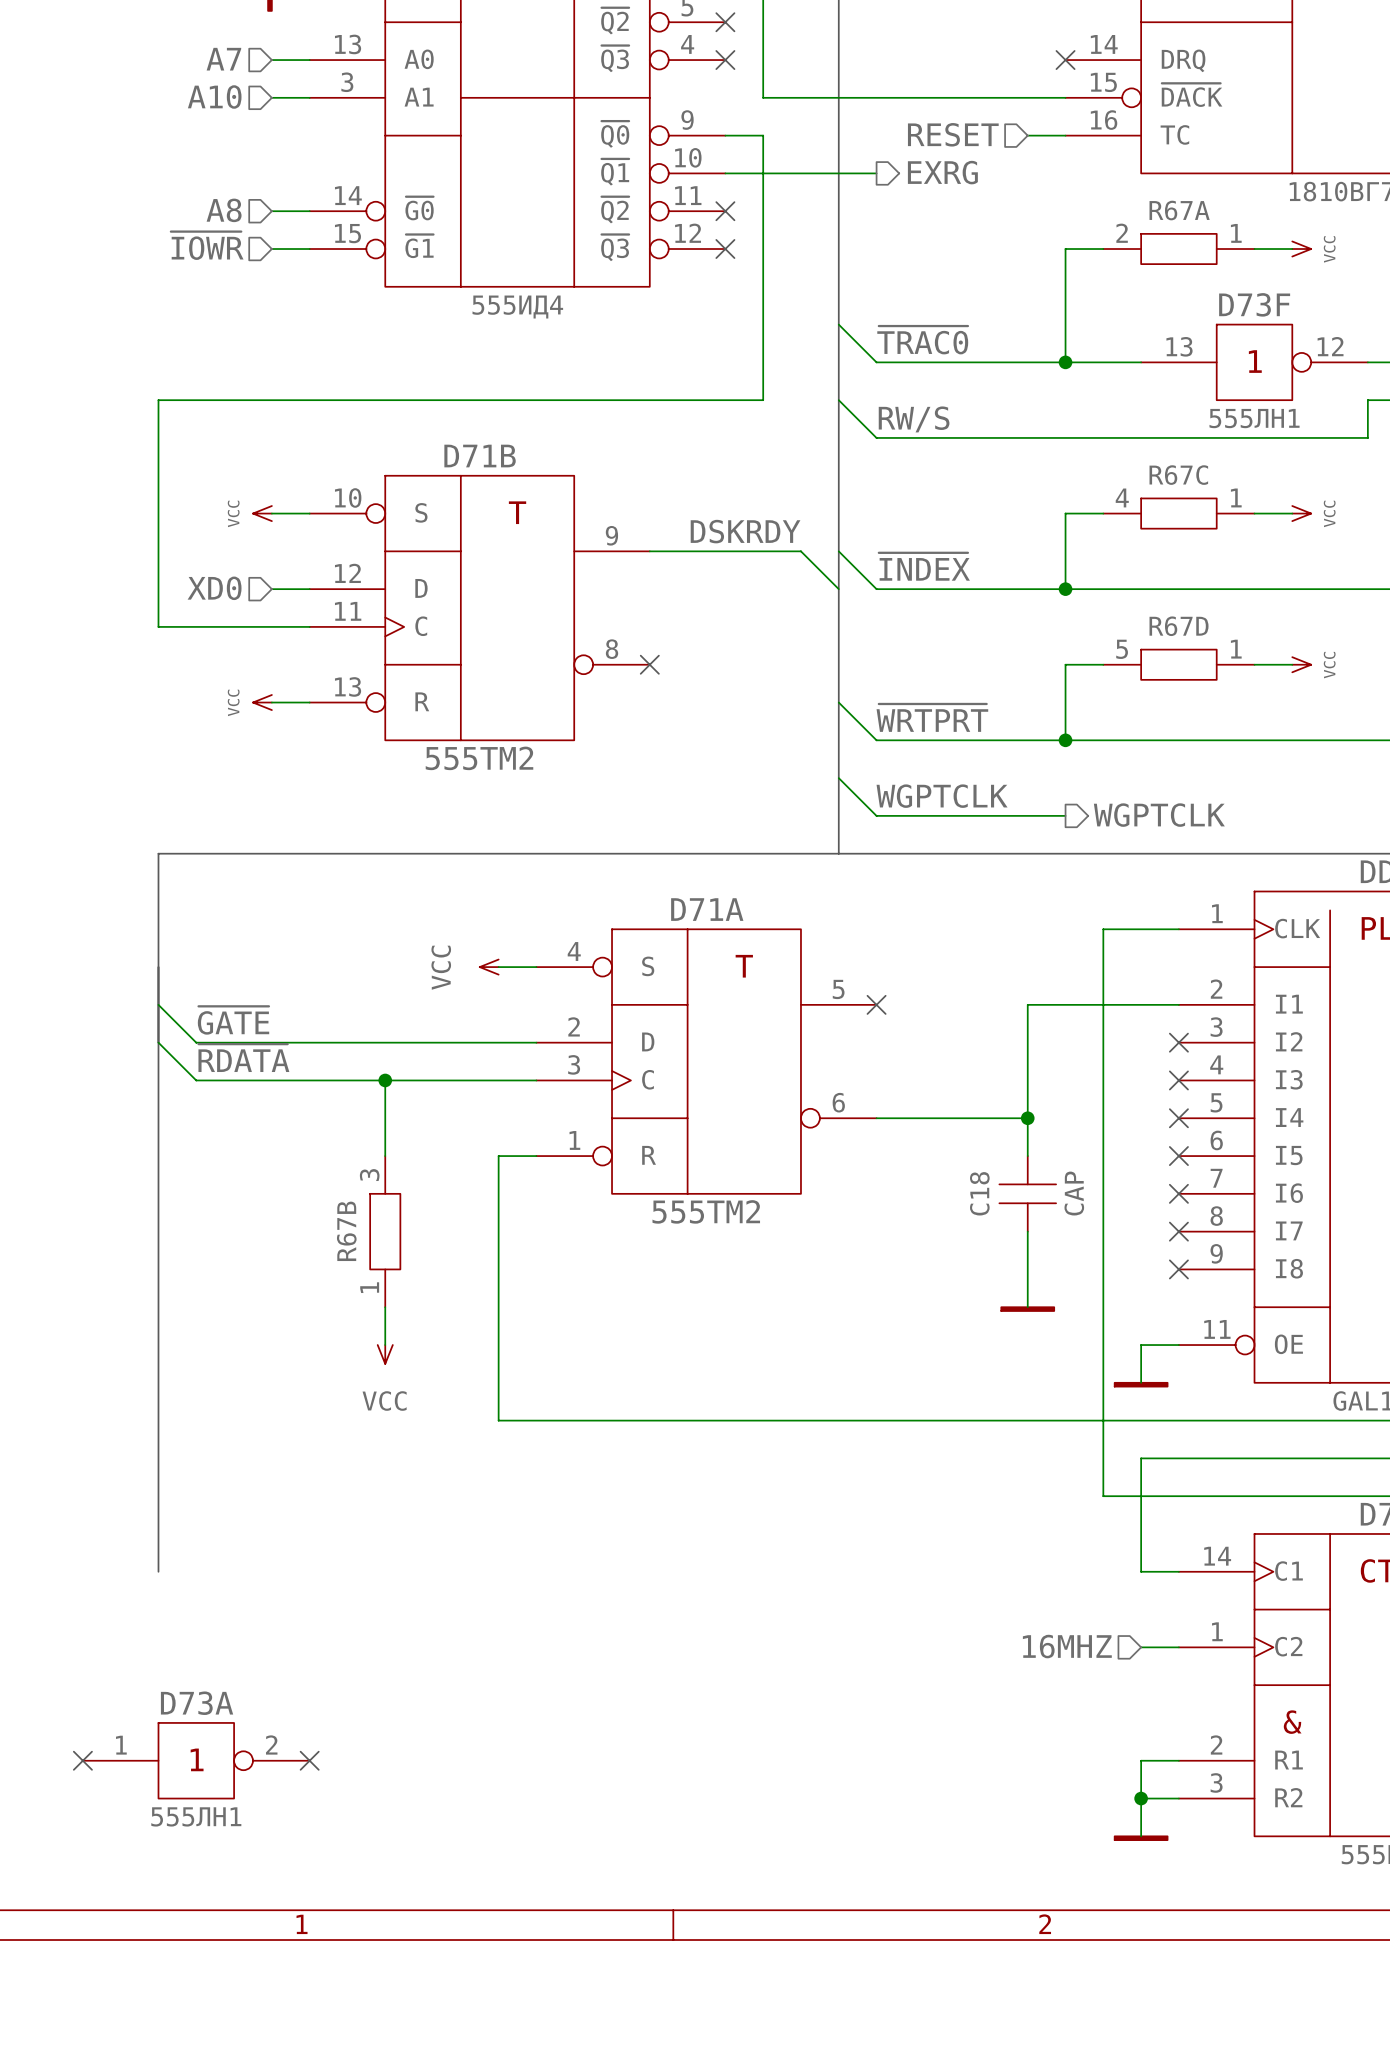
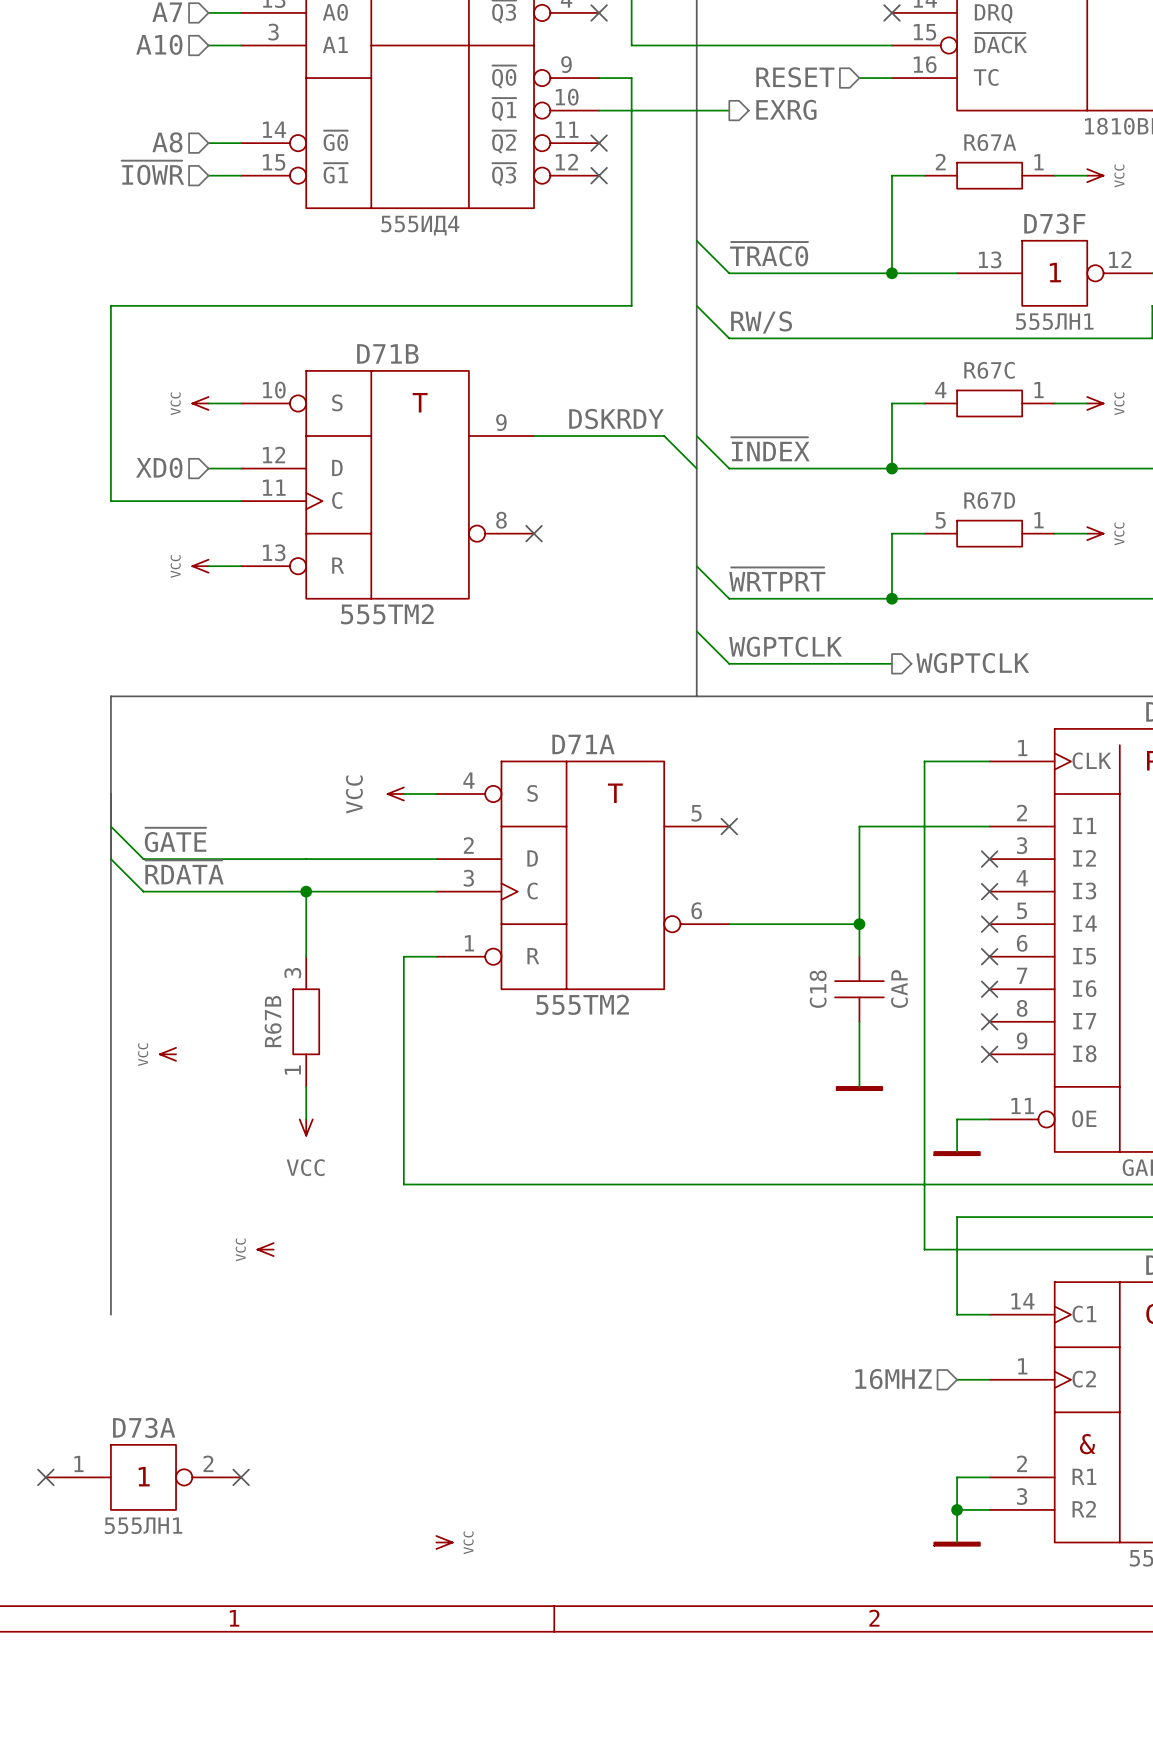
power symbol: none -> VCC (167, 1054)
power symbol: none -> VCC (265, 1249)
power symbol: none -> VCC (444, 1542)

